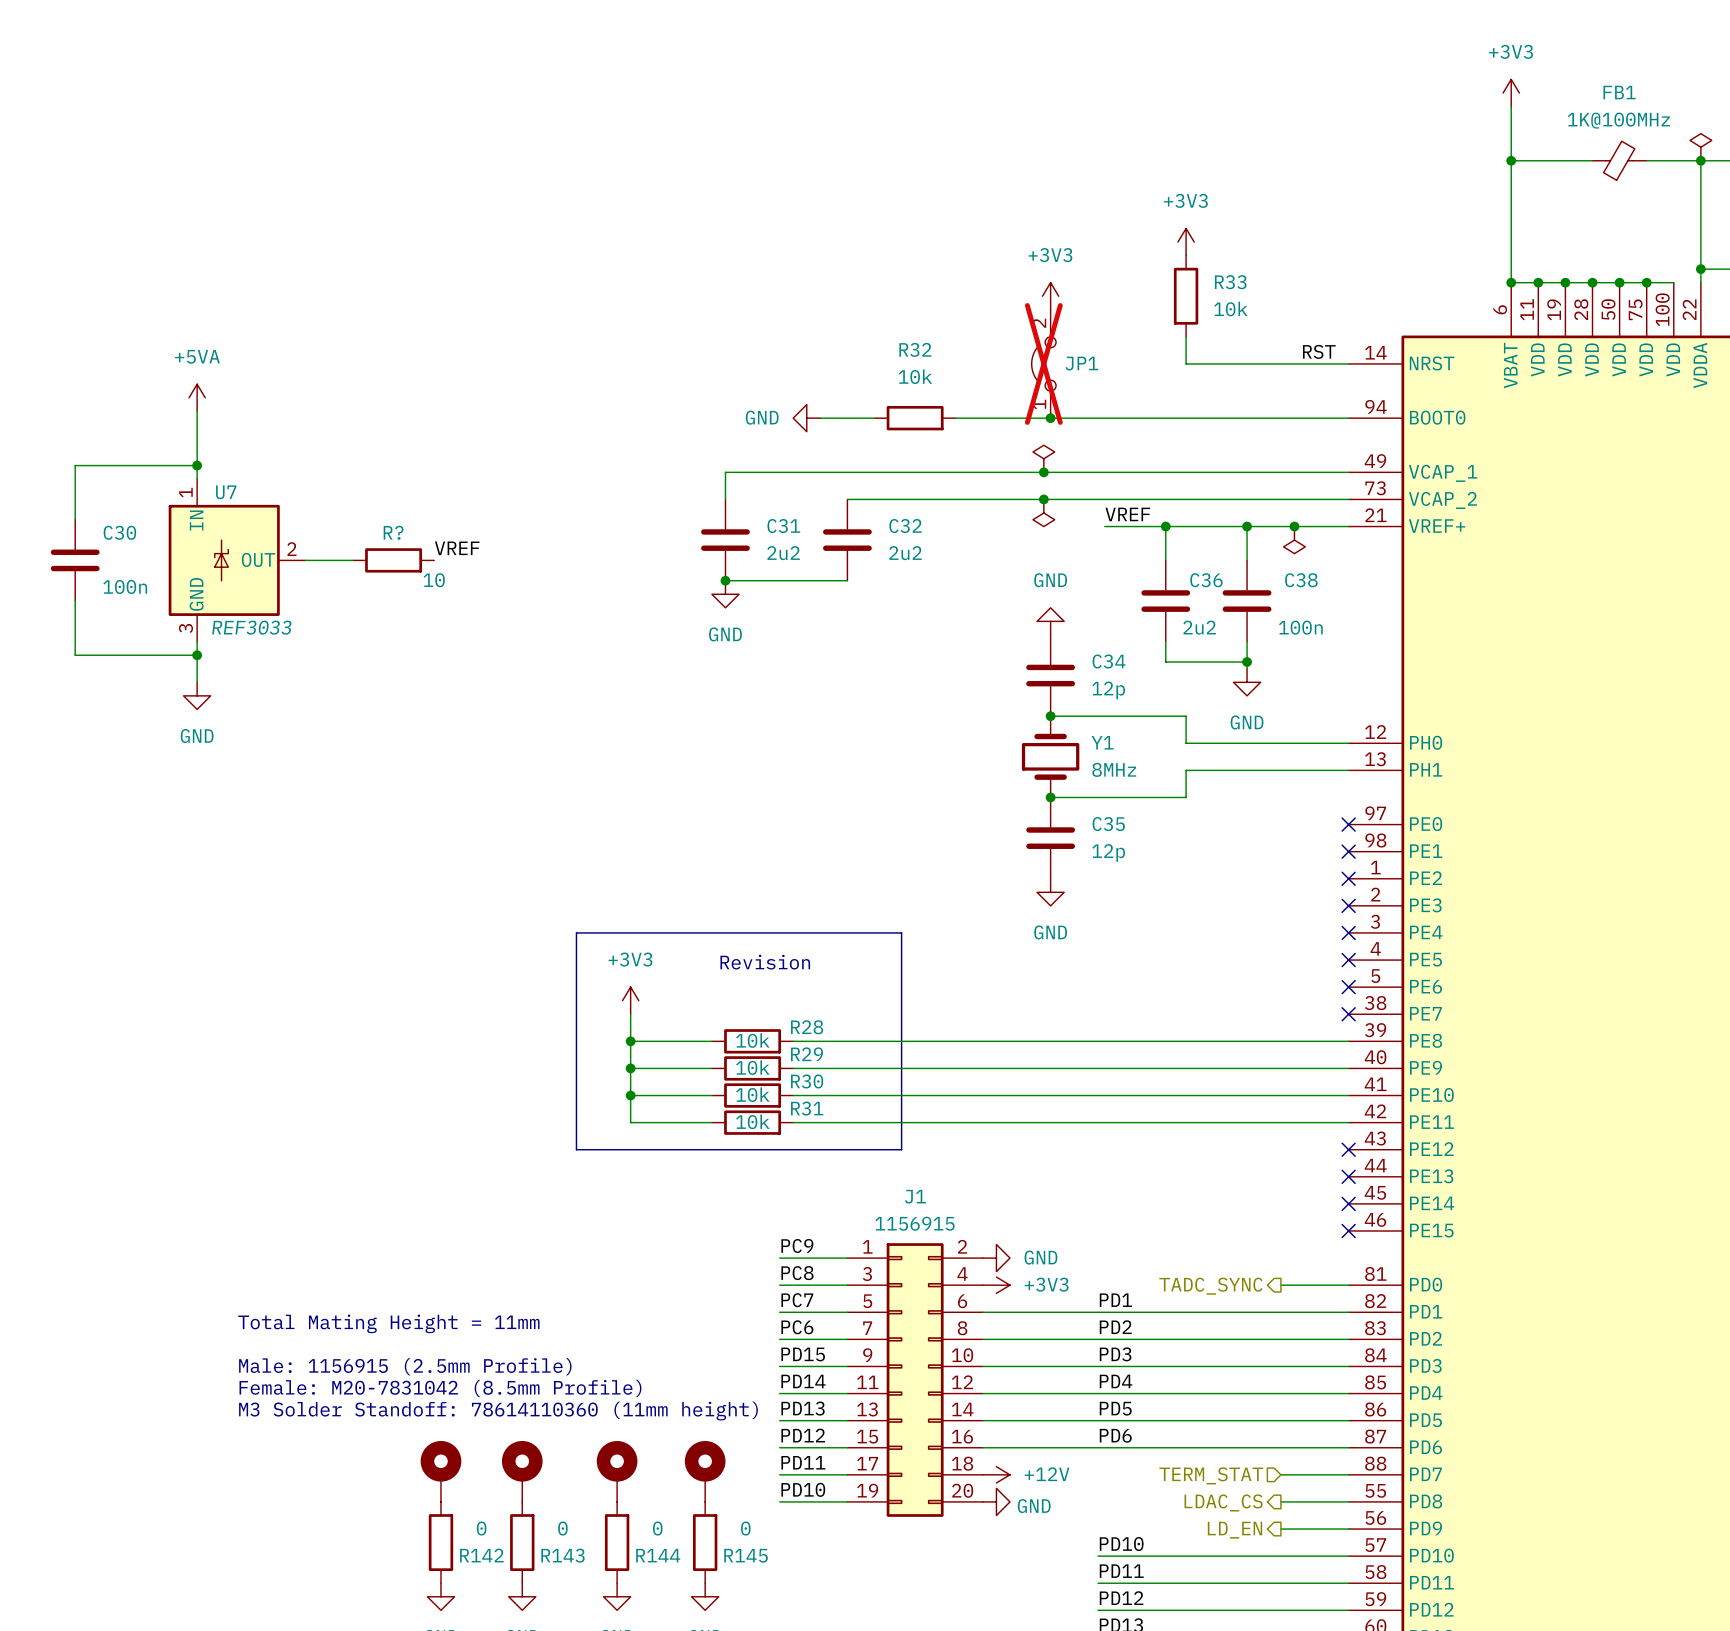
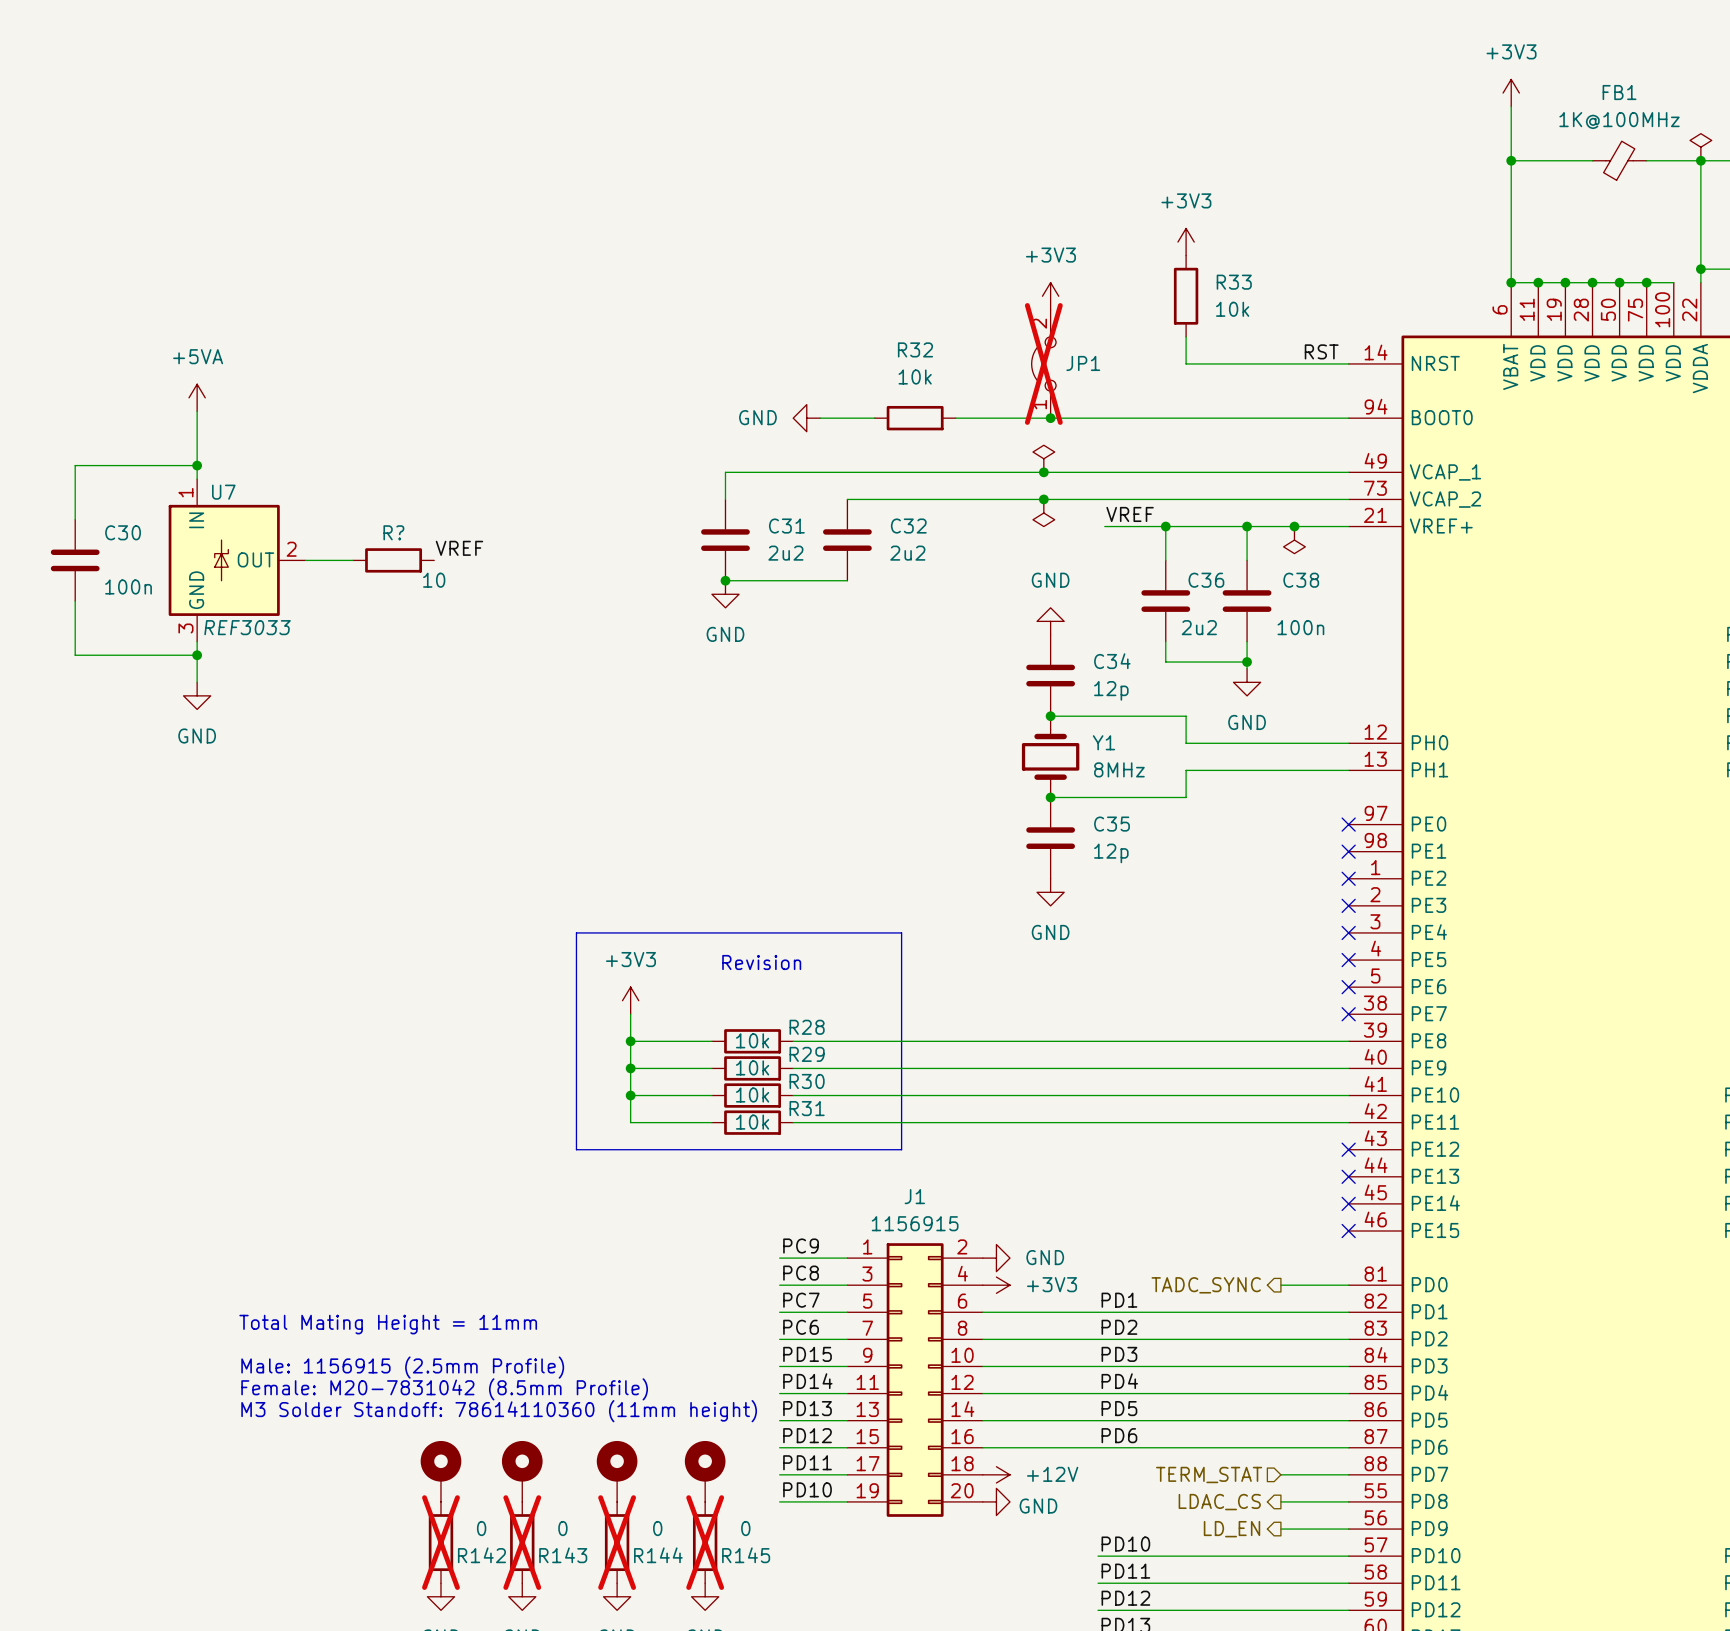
R142 do-not-place cross: none -> (440, 1542)
R143 do-not-place cross: none -> (522, 1542)
R144 do-not-place cross: none -> (617, 1542)
R145 do-not-place cross: none -> (705, 1542)

